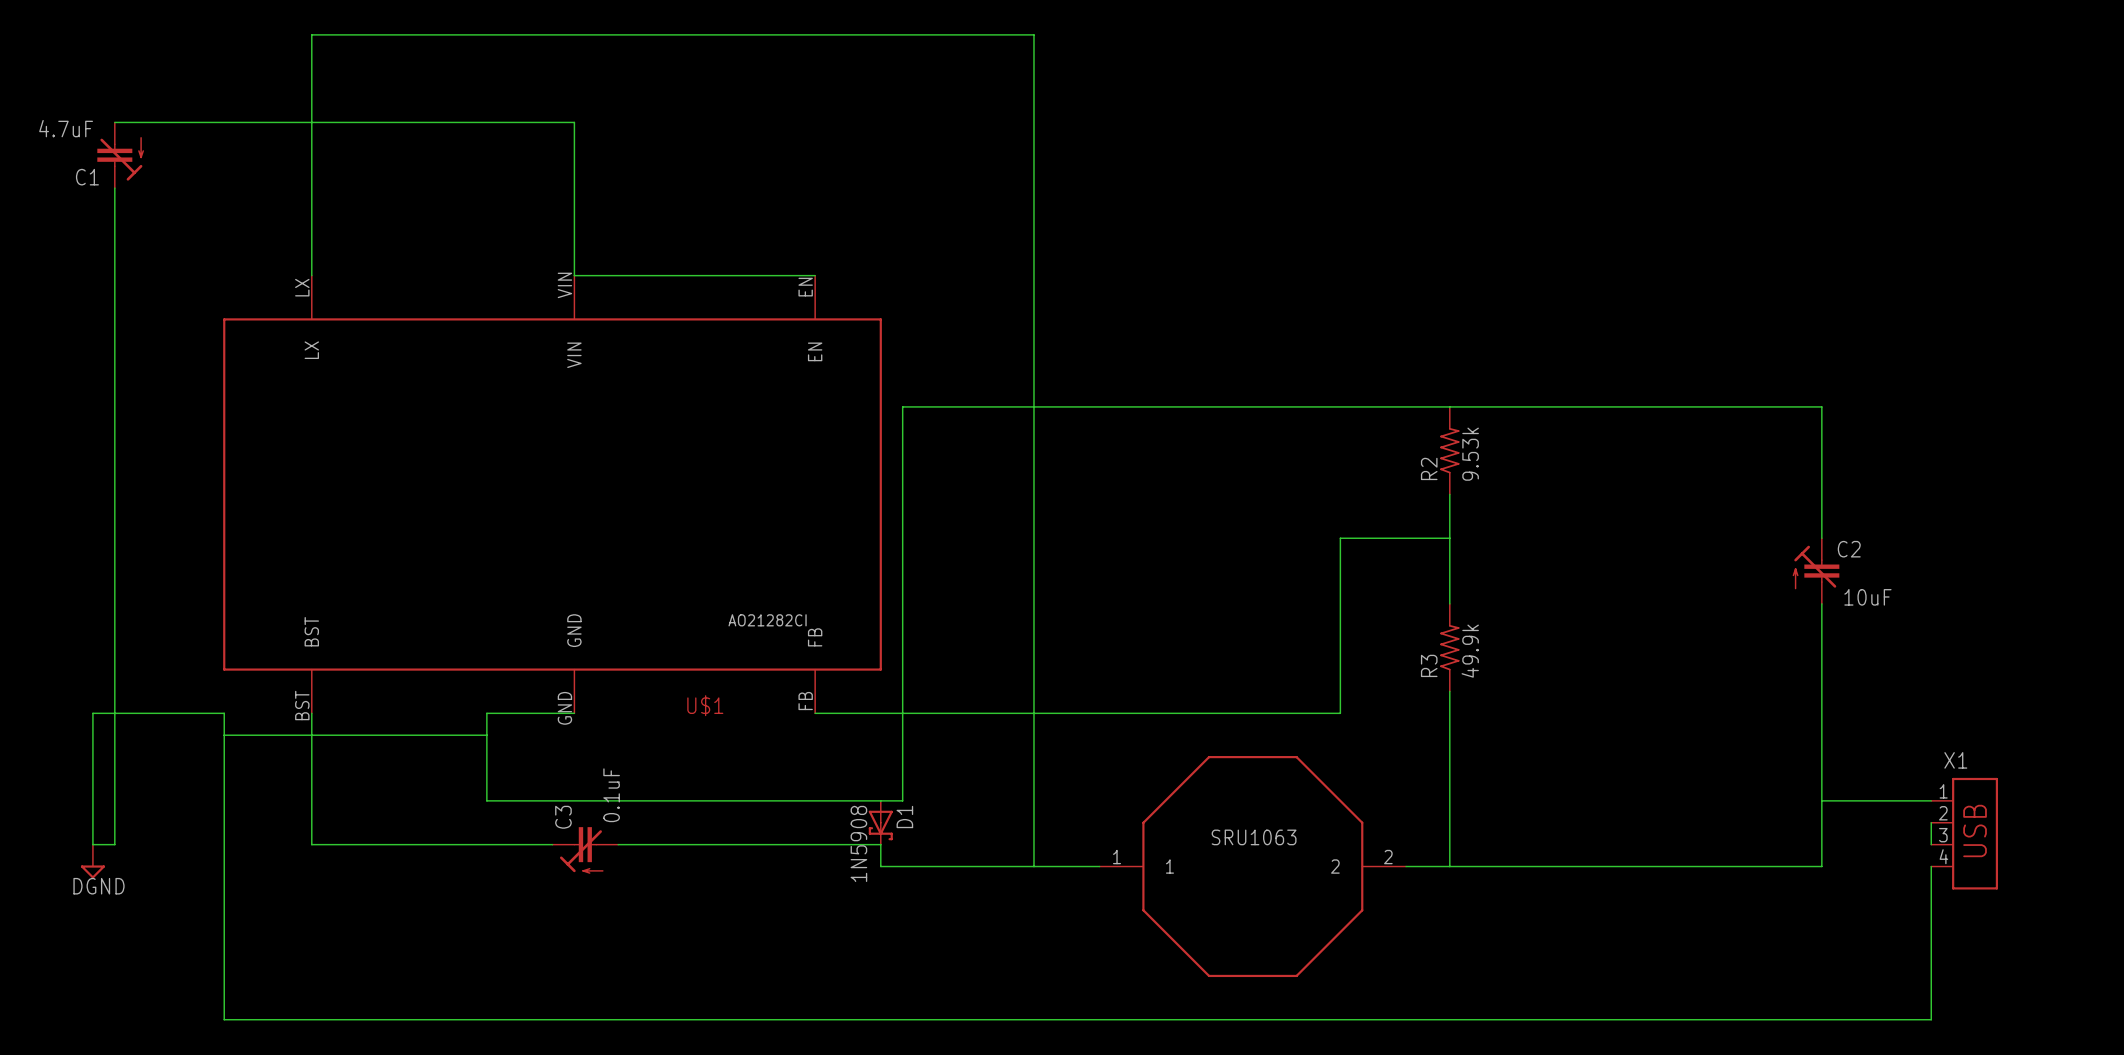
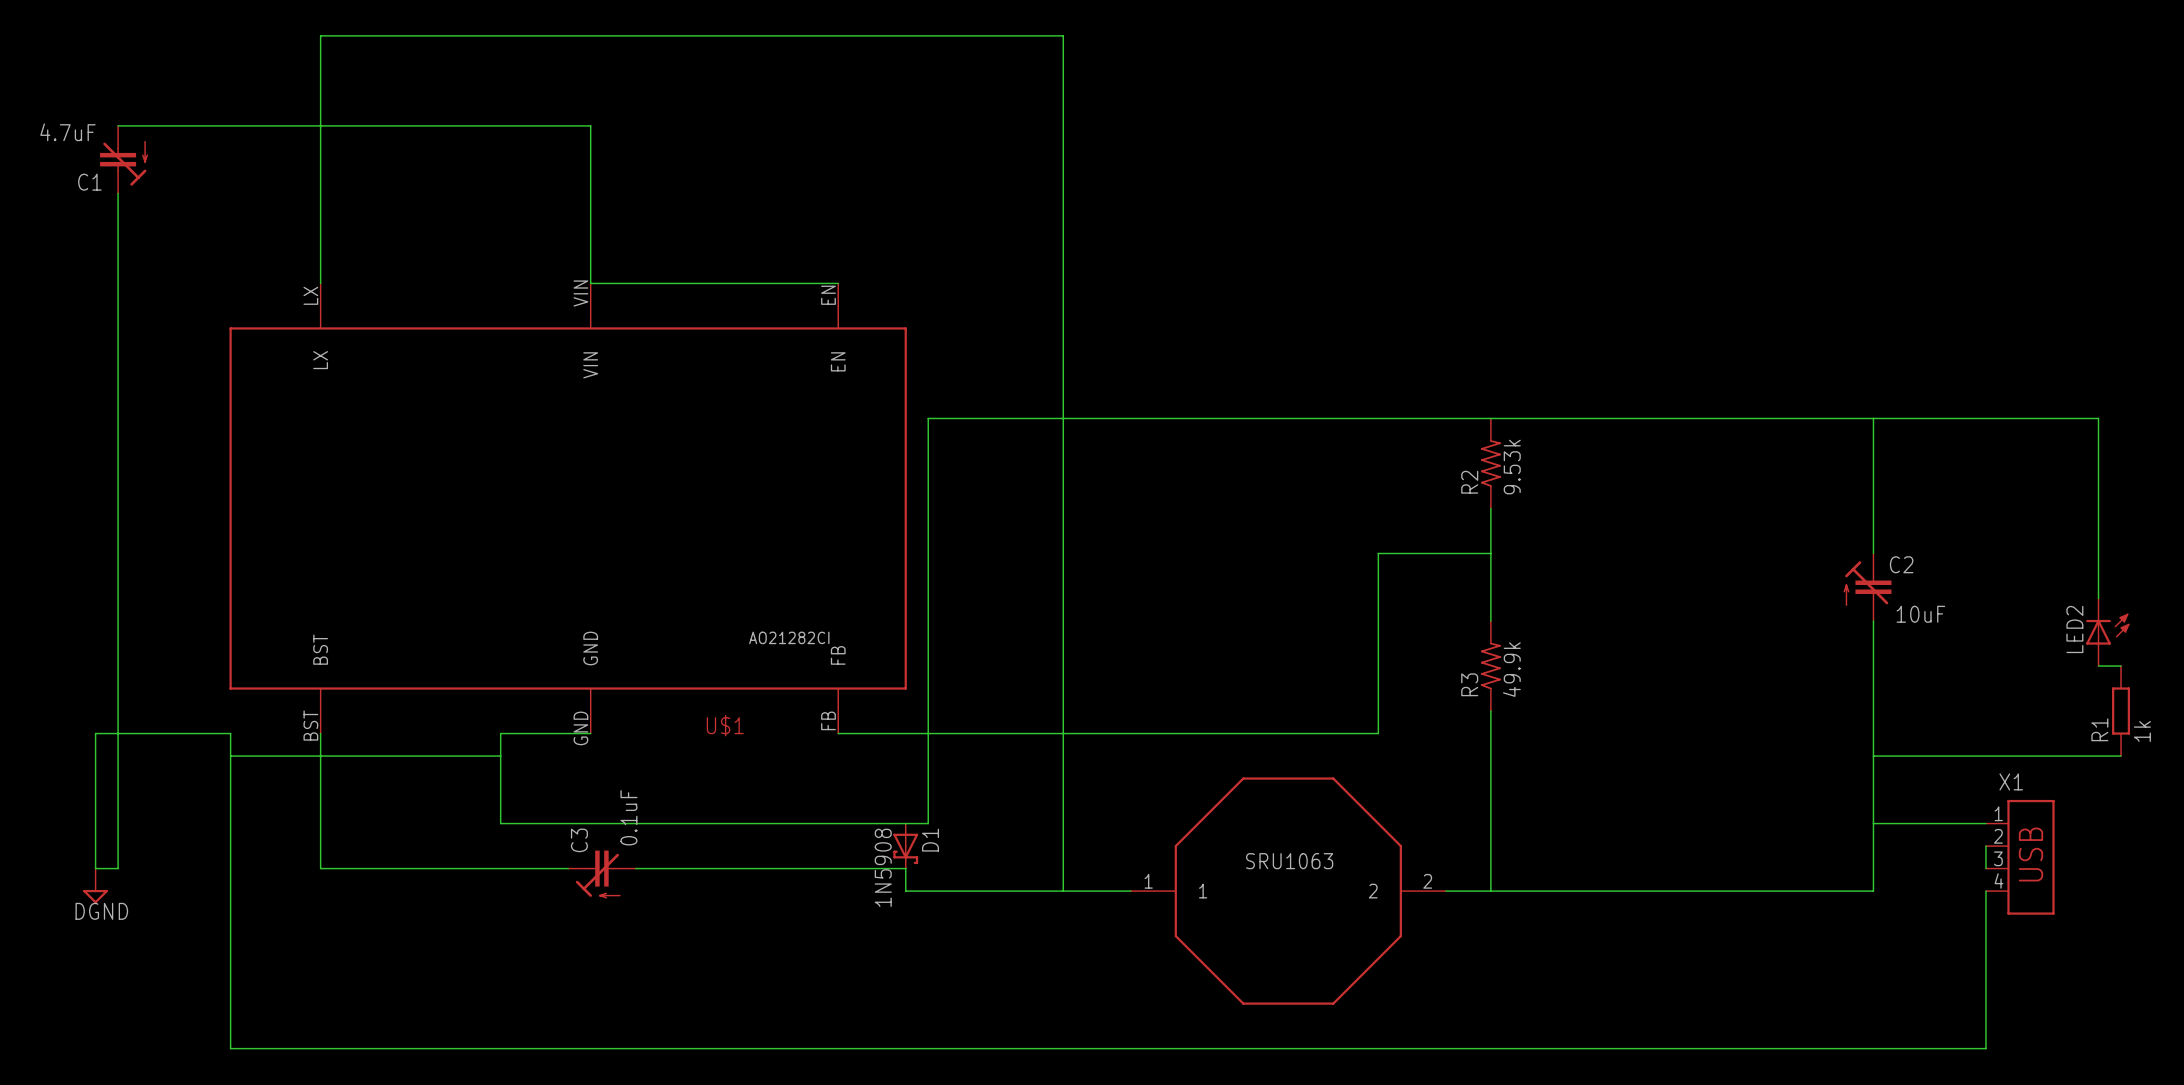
wire: none -> (1873, 418) (2098, 418) (2098, 598)
LED2: none -> (2107, 632)
wire: none -> (2098, 666) (2121, 666)
R1: none -> 1k (2121, 711)
wire: none -> (1873, 756) (2121, 756)

